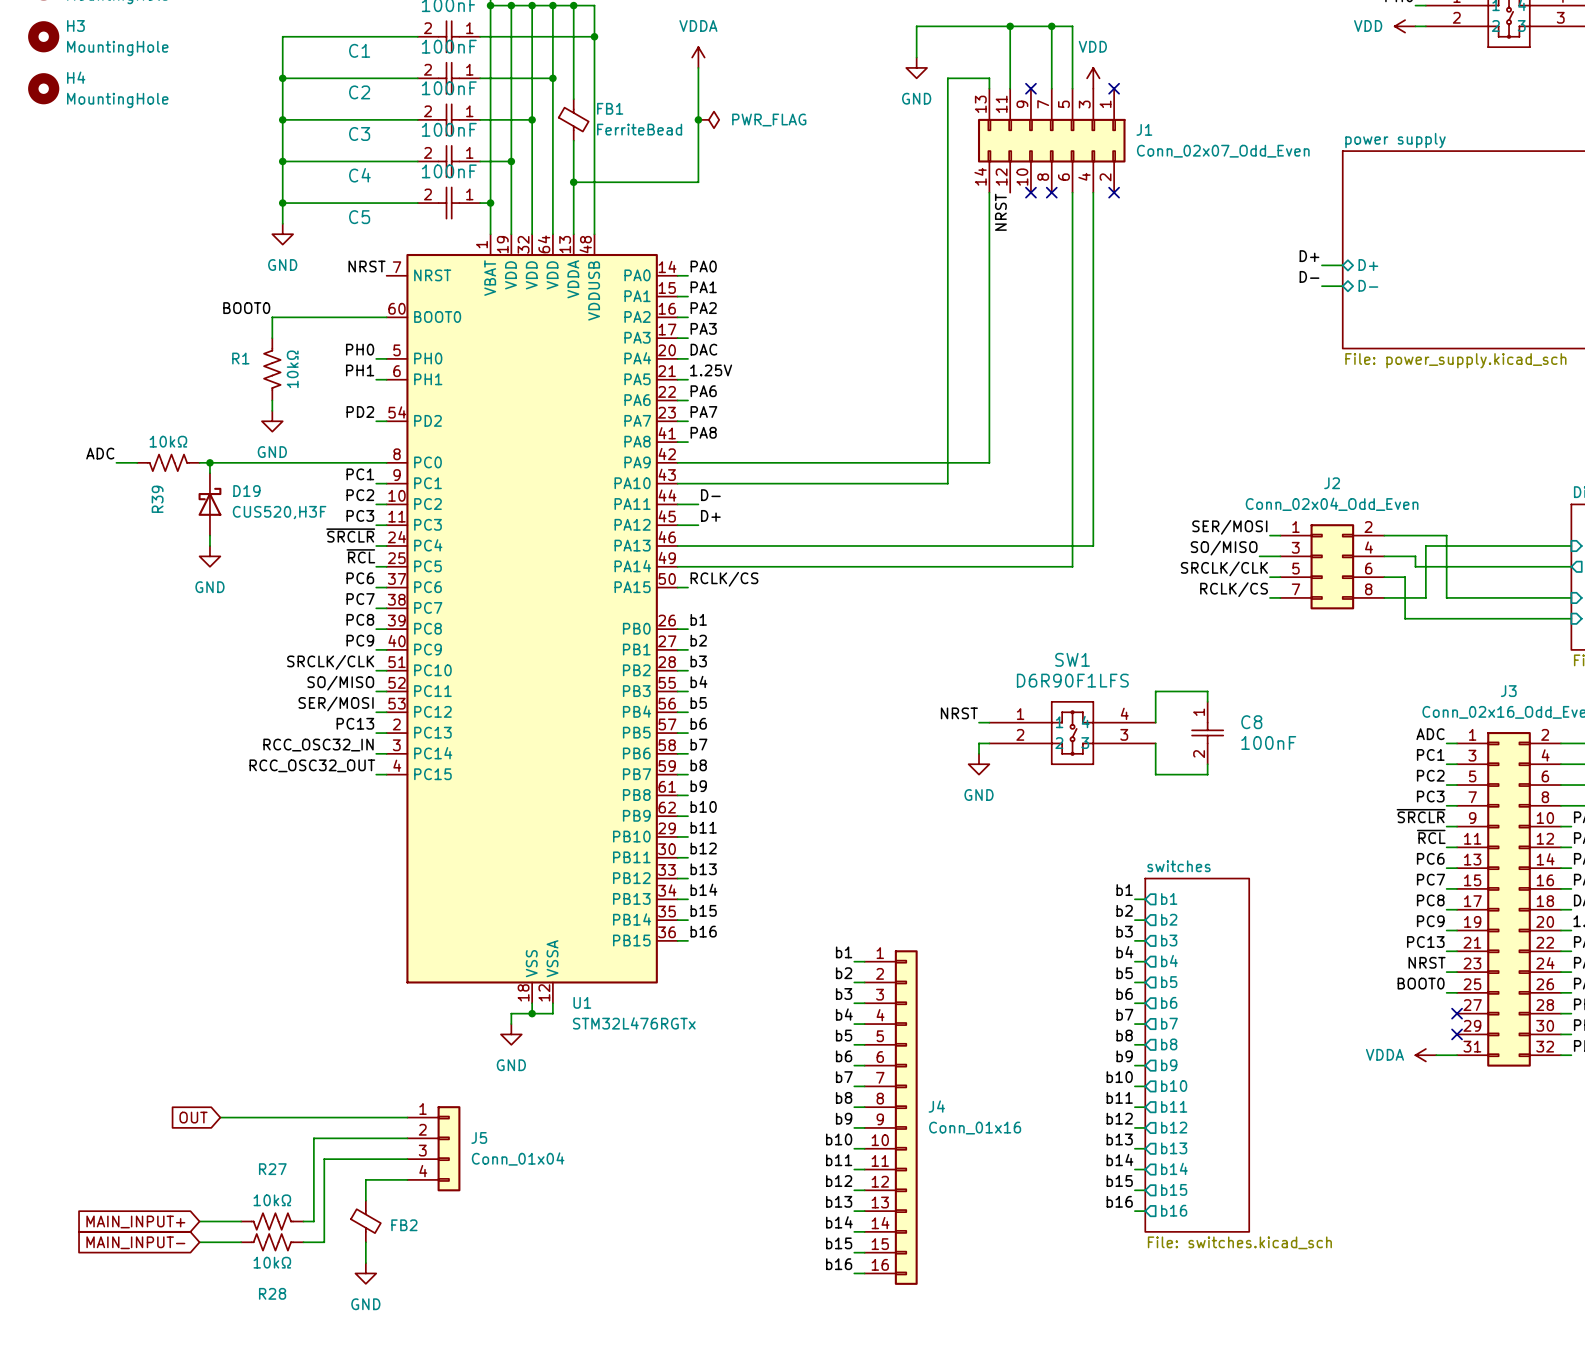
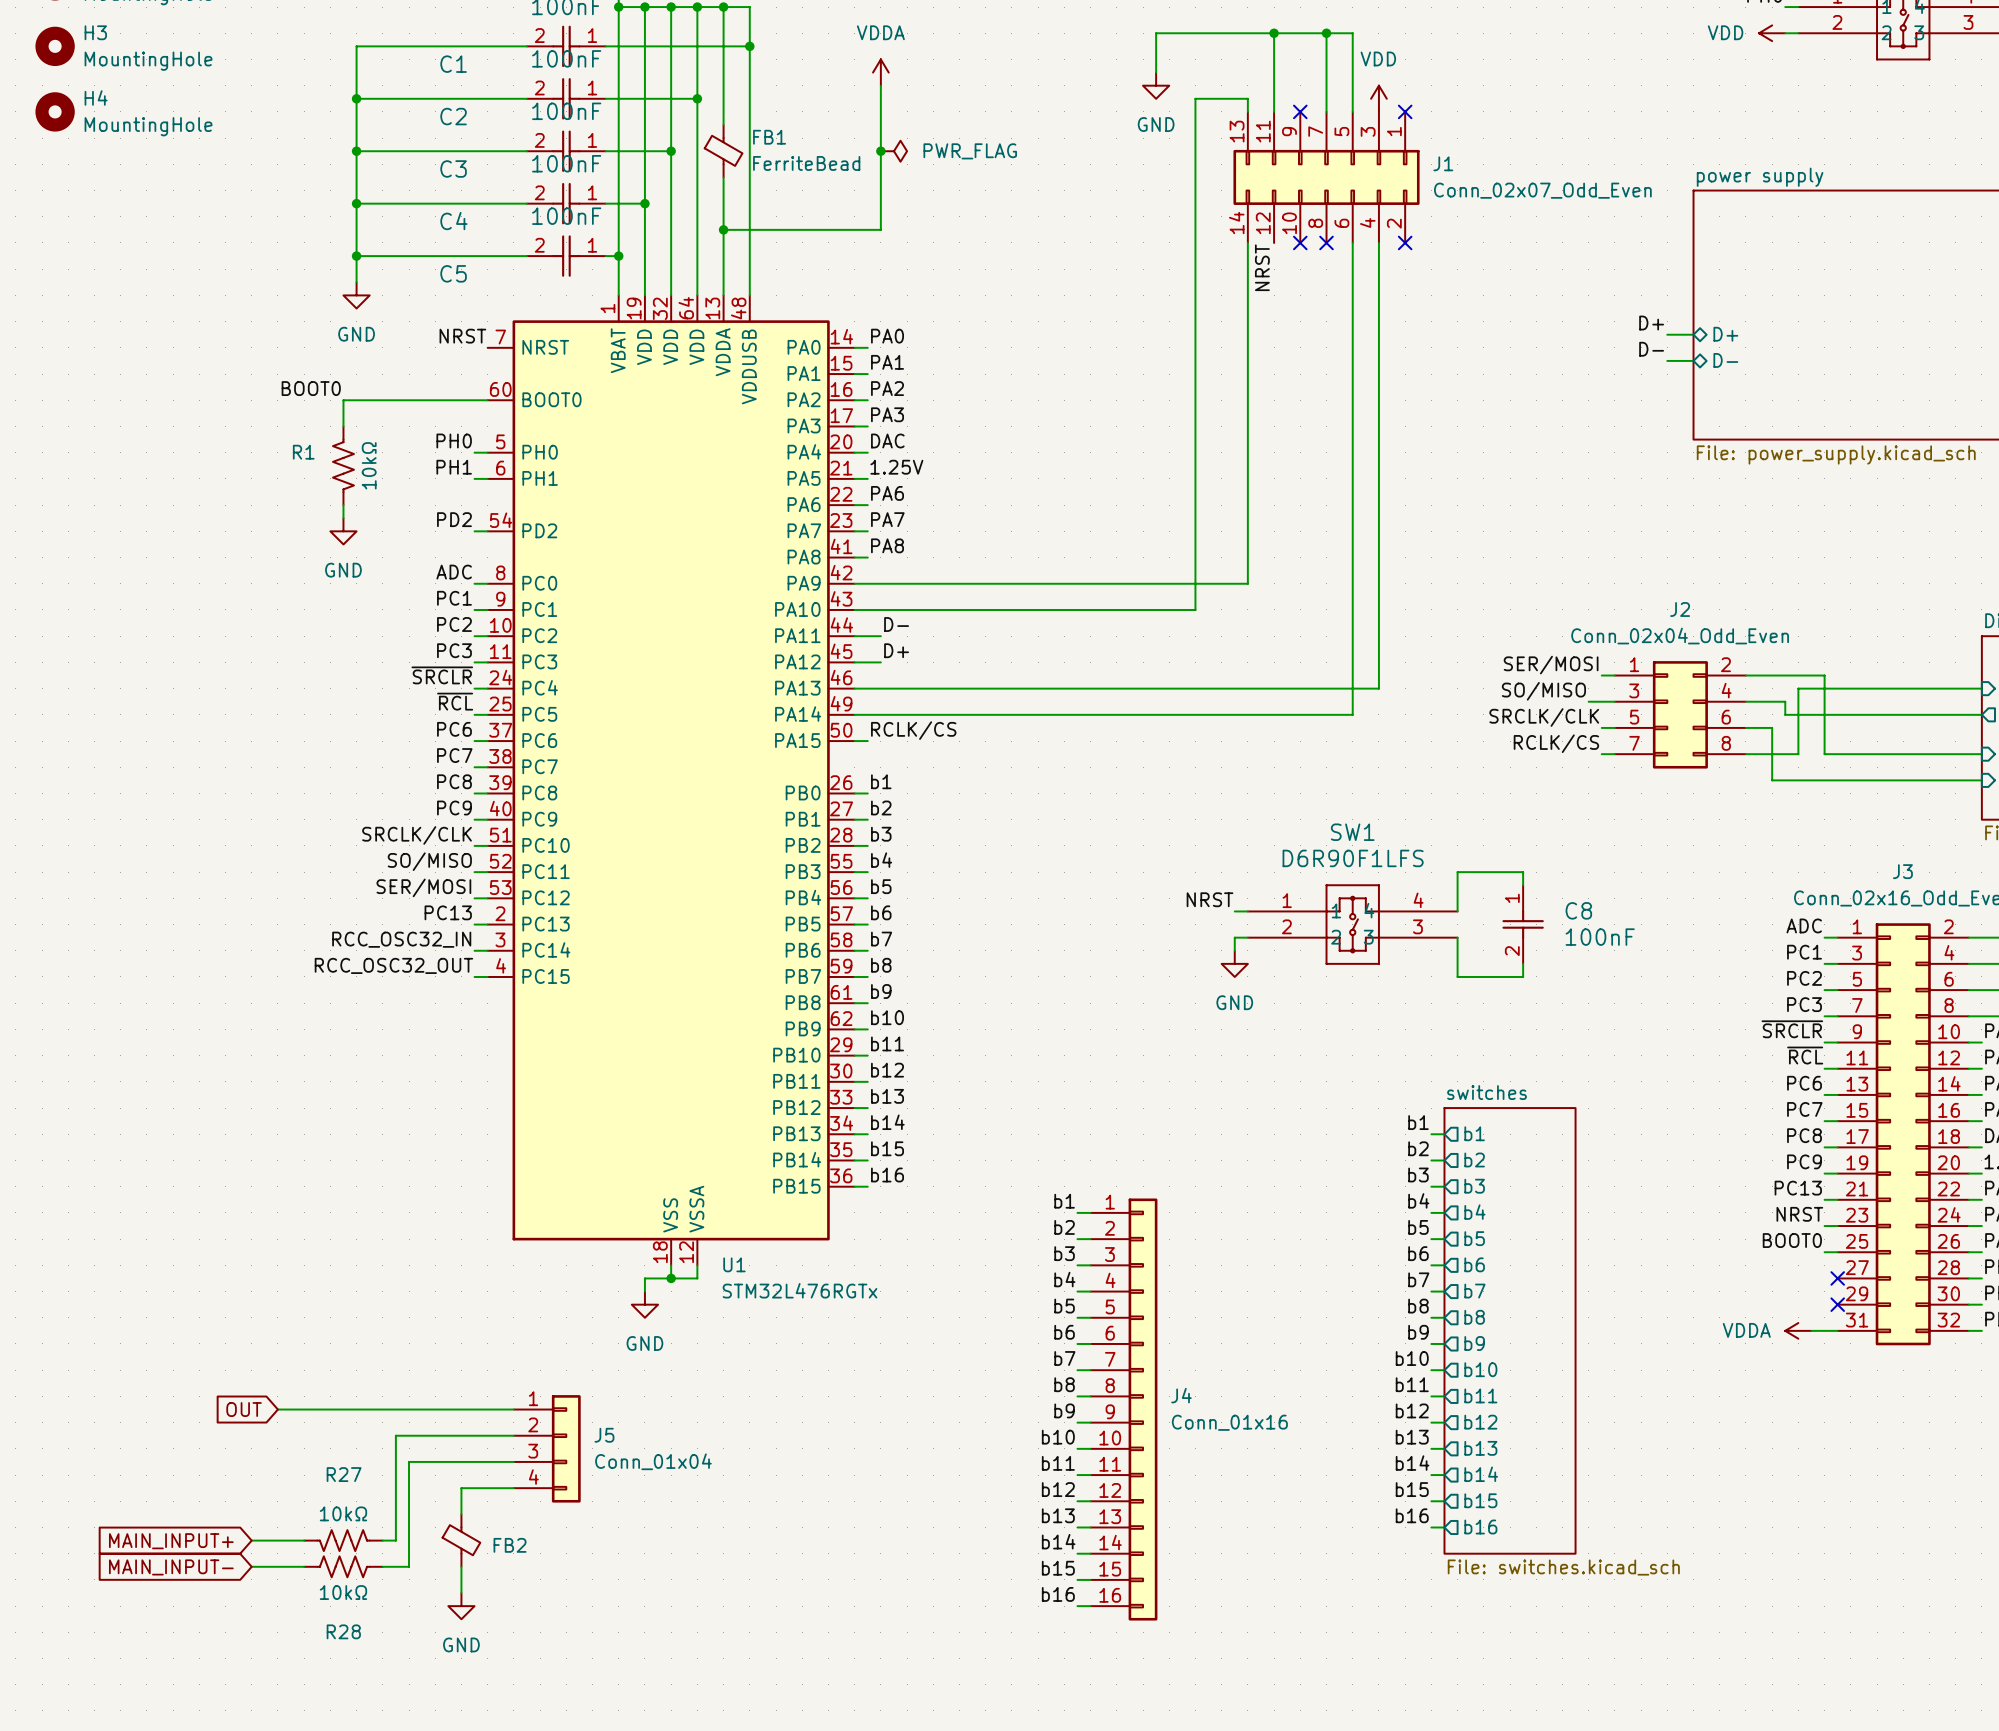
label: ADC (100, 453) -> none
label: none -> ADC (454, 572)
wire: (116, 462) (137, 462) -> none
R39: 10kΩ (168, 462) -> none
wire: (199, 462) (376, 462) -> none
wire: (209, 462) (209, 473) -> none
junction: (209, 462) -> none
D19: CUS520,H3F (209, 504) -> none
wire: (209, 535) (209, 545) -> none
power symbol: GND (209, 556) -> none

